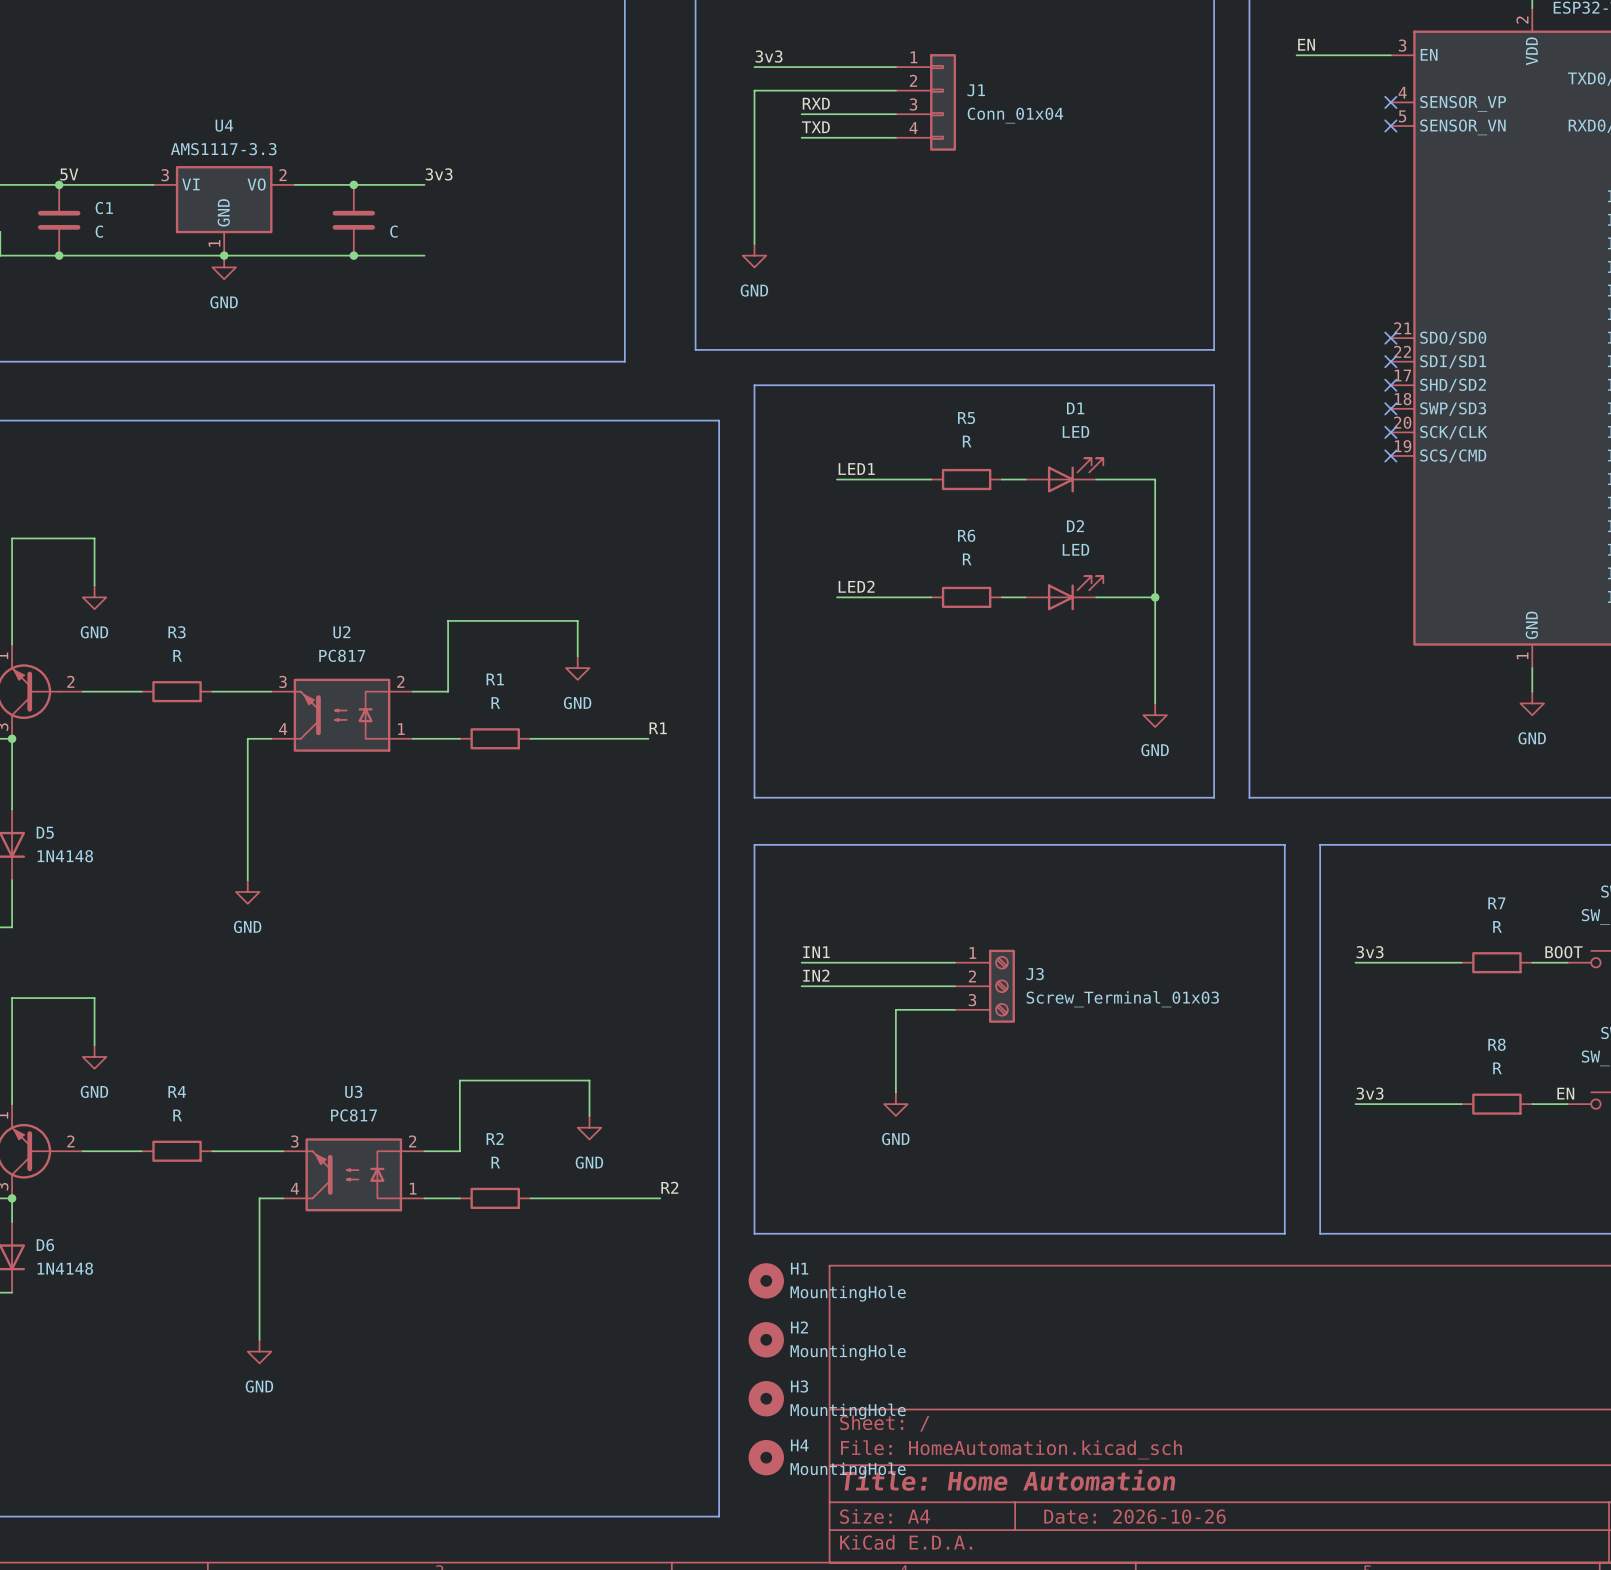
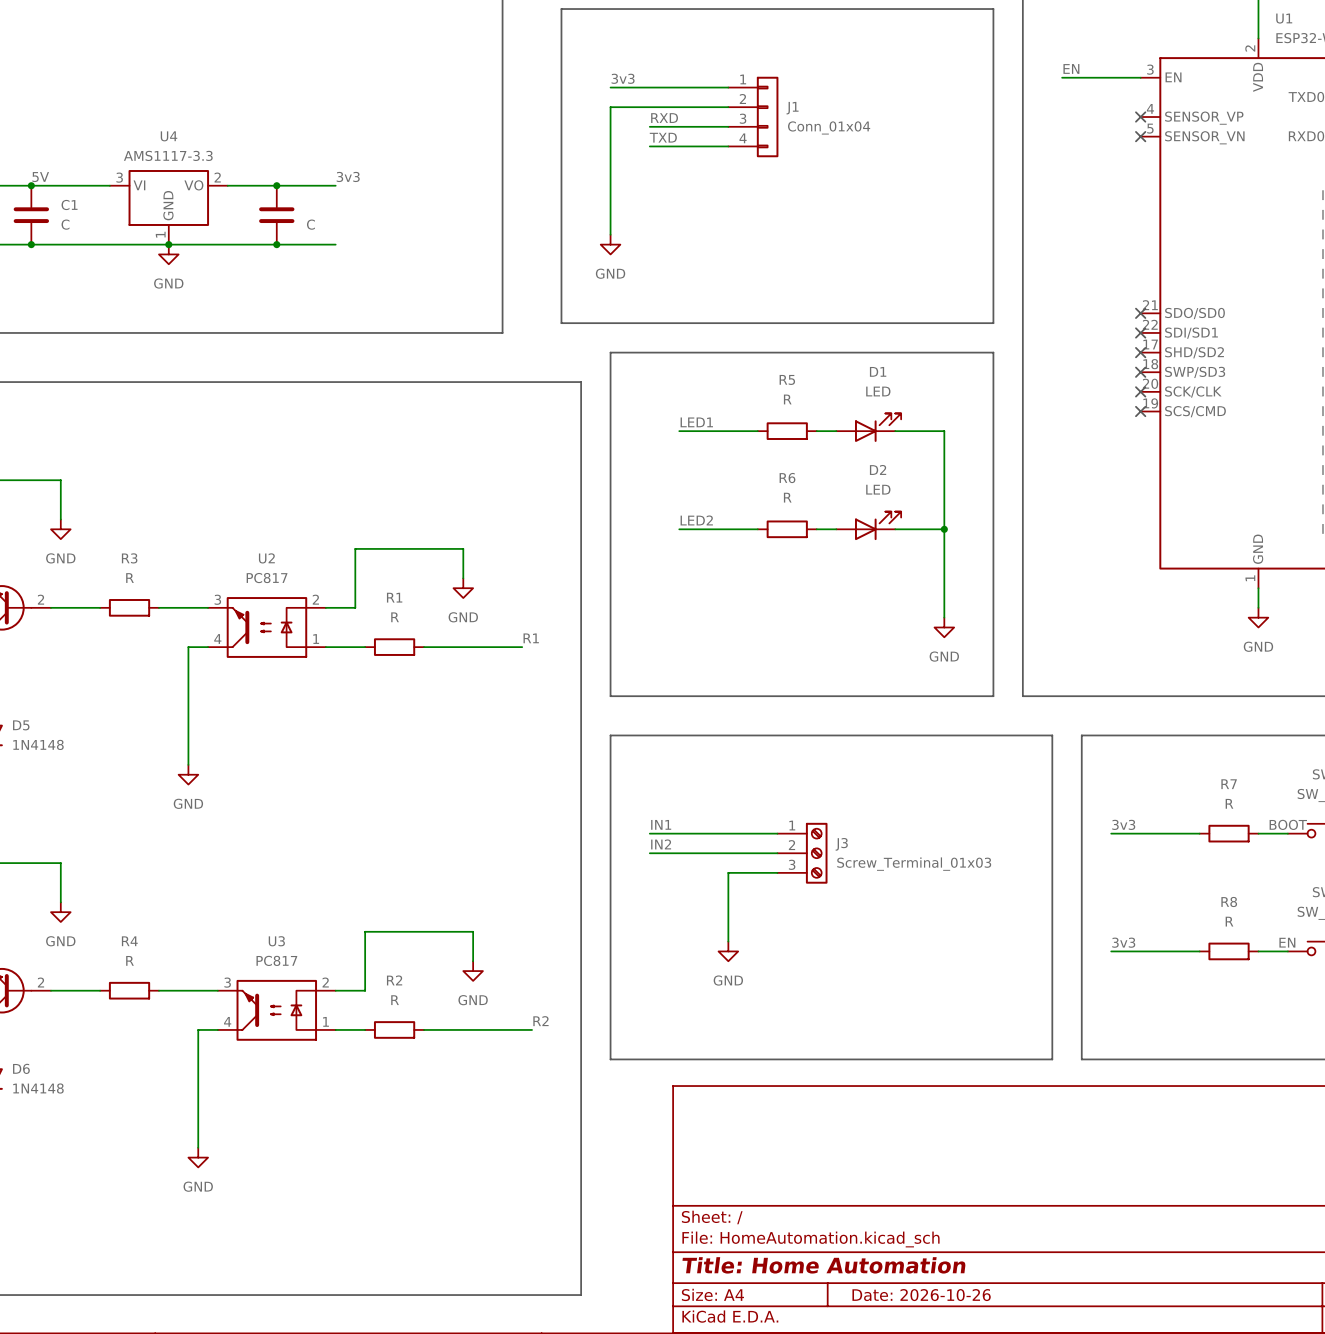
H1: MountingHole (766, 1280) -> none
H2: MountingHole (766, 1339) -> none
H3: MountingHole (766, 1398) -> none
H4: MountingHole (766, 1457) -> none

